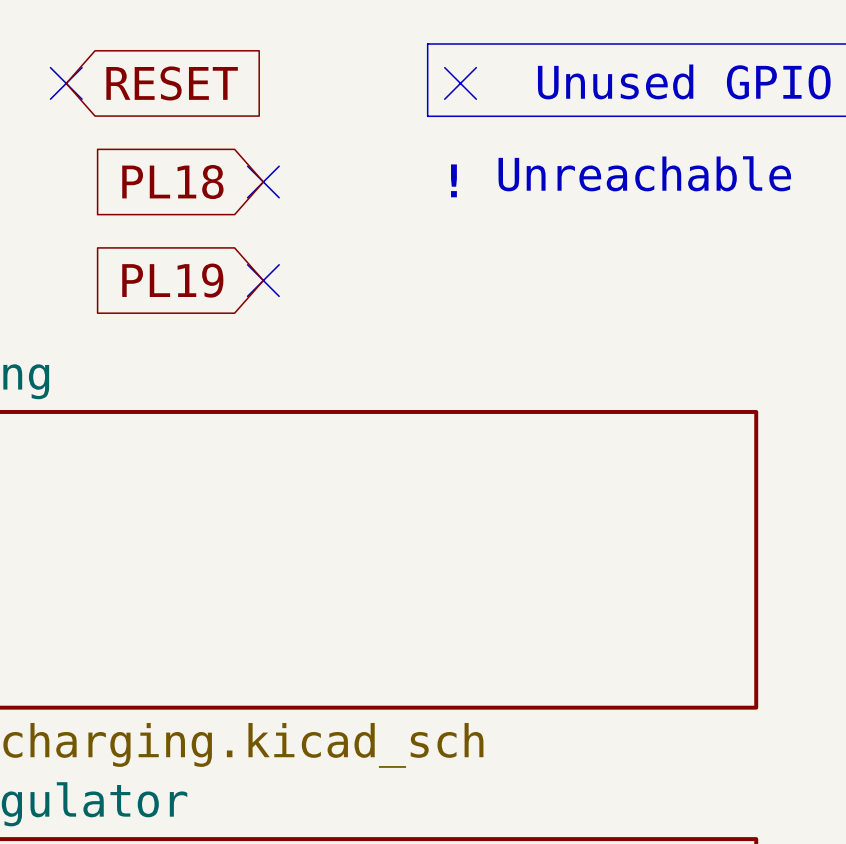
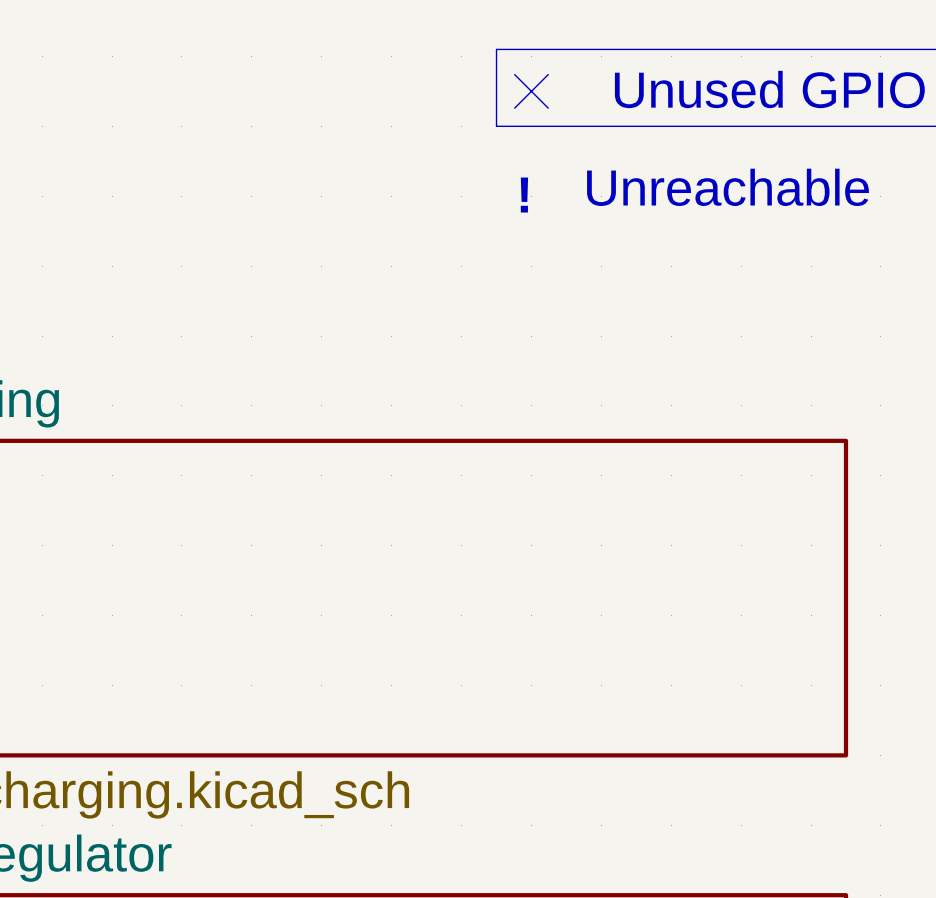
no-connect mark: (66, 83) -> none
global label: RESET (172, 83) -> none
no-connect mark: (263, 181) -> none
global label: PL18 (172, 182) -> none
global label: PL19 (172, 280) -> none
no-connect mark: (263, 280) -> none

